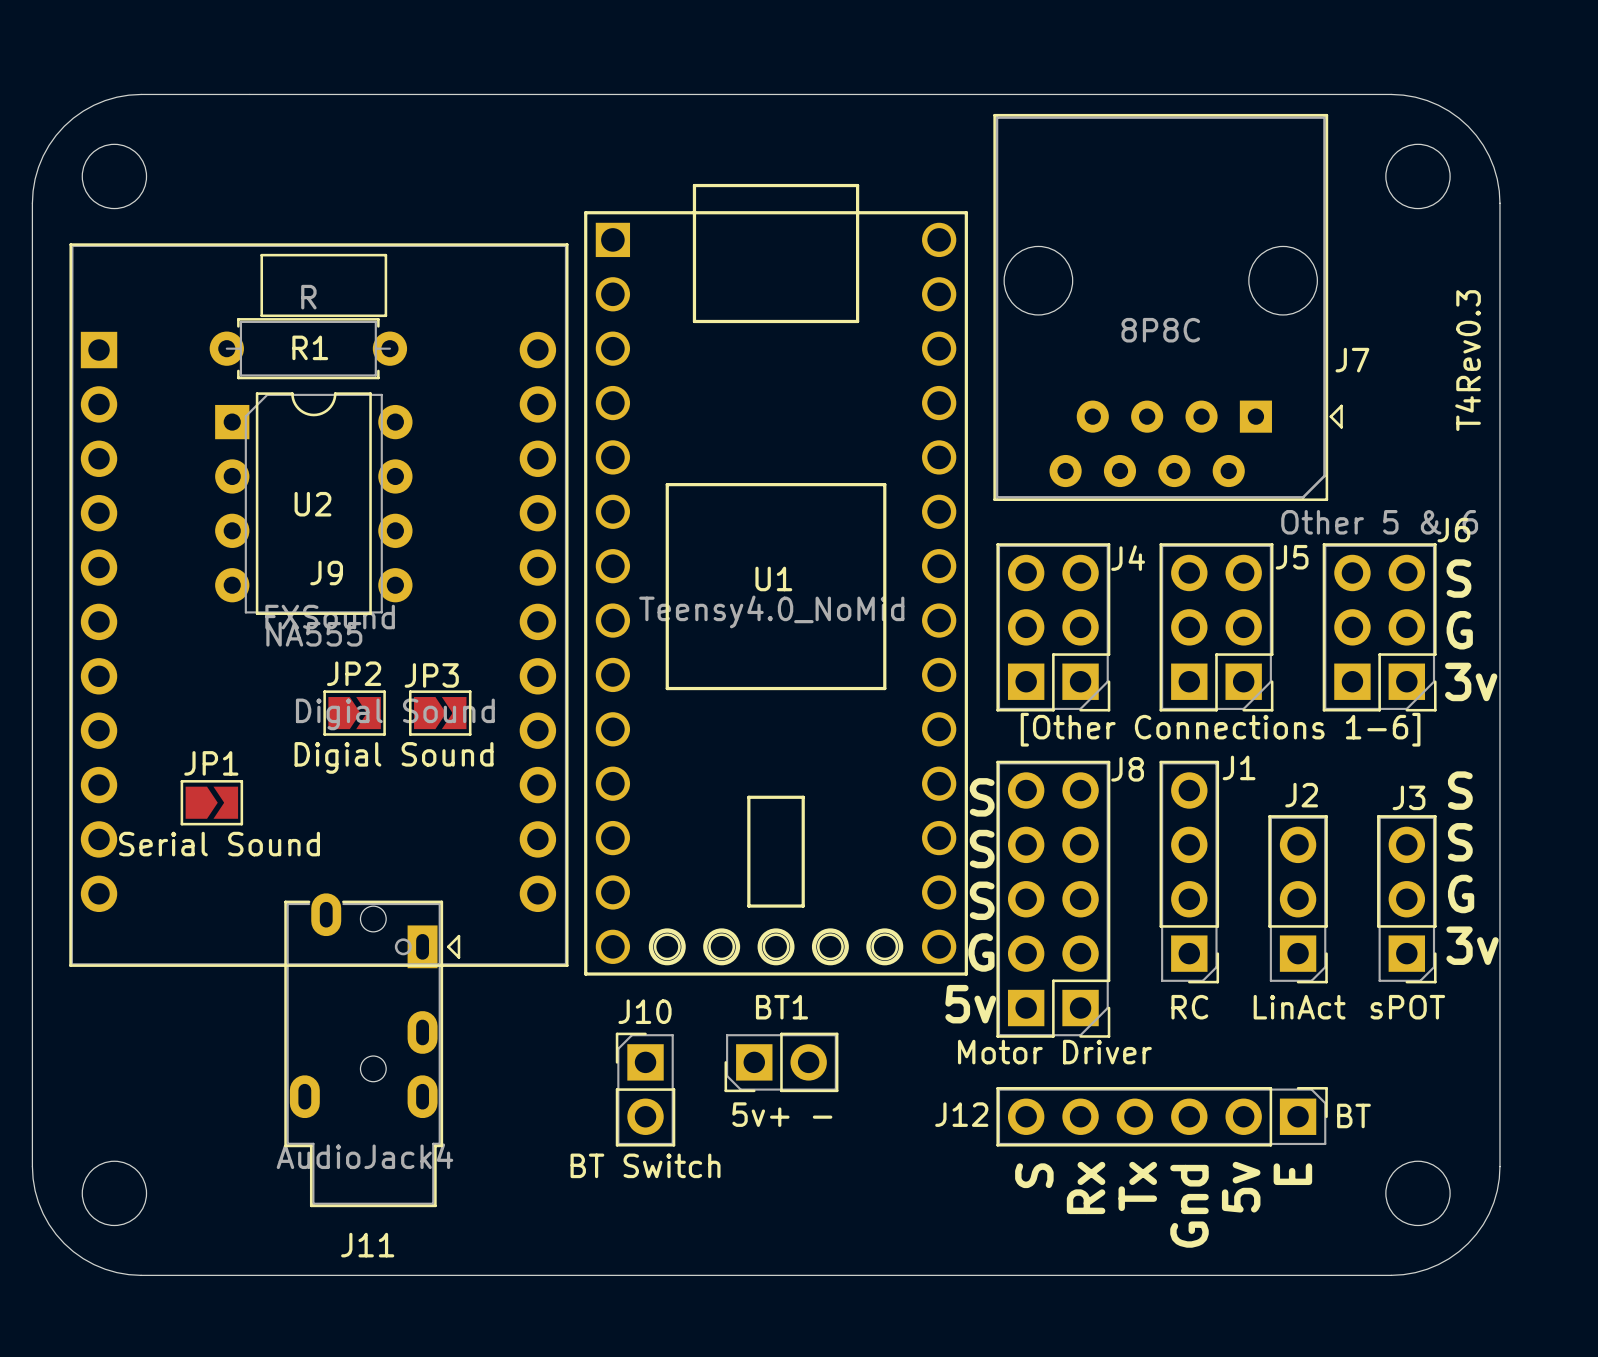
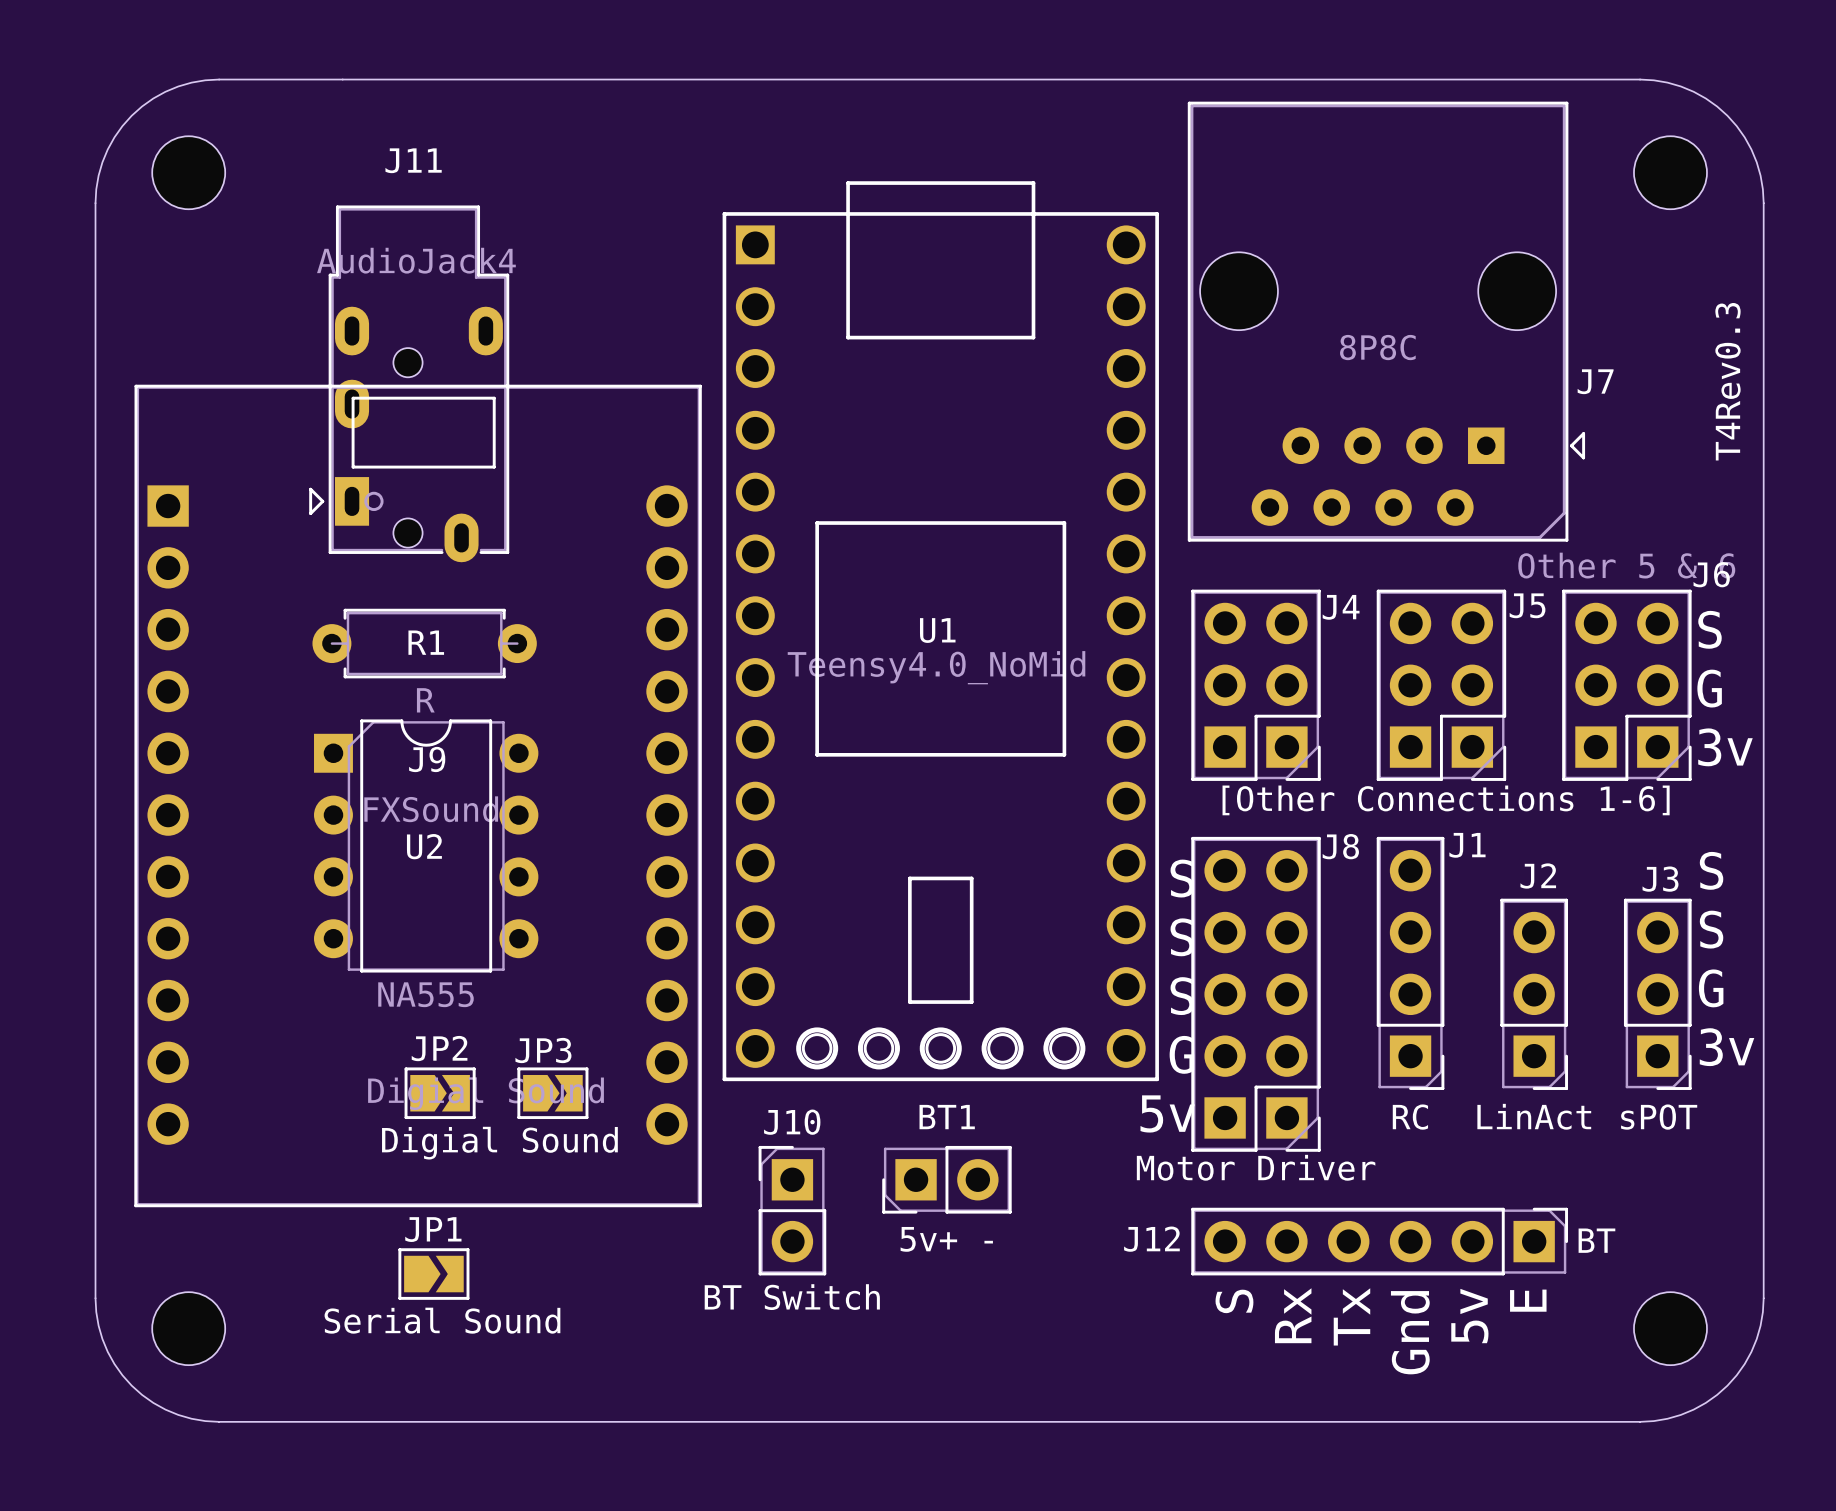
R1 value position: R (308, 297) -> R (425, 700)
R1 position: (308, 348) -> (424, 643)
U2 position: (313, 503) -> (426, 845)
J9 position: (318, 605) -> (418, 795)
JP2 position: (354, 713) -> (440, 1093)
JP3 position: (440, 713) -> (552, 1093)
JP1 position: (211, 802) -> (433, 1274)
J11 rotation: 0° (372, 1050) -> 180° (409, 383)
J11 position: (372, 1050) -> (409, 383)

